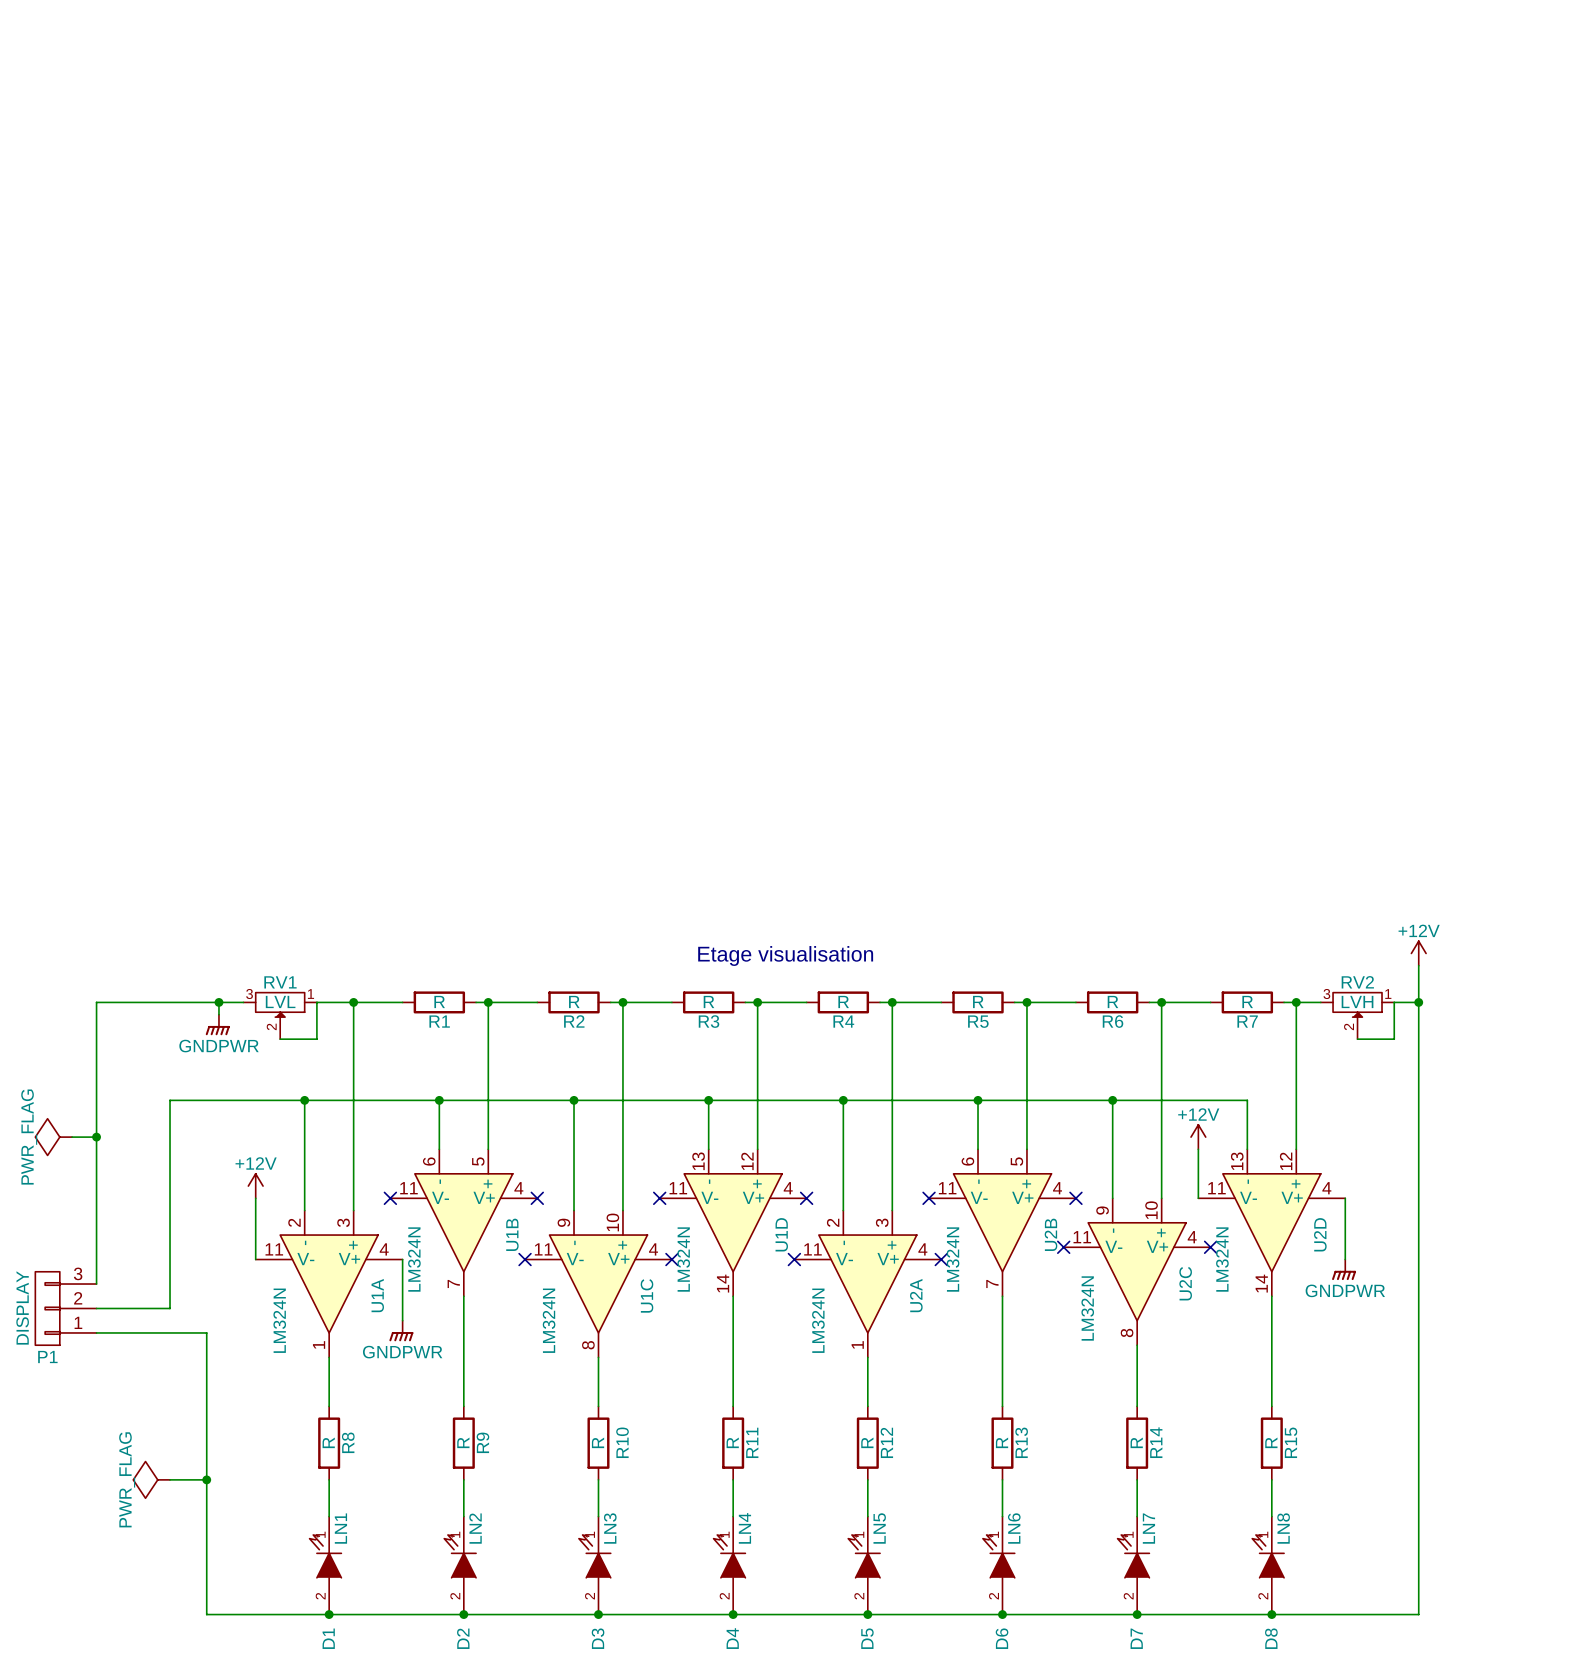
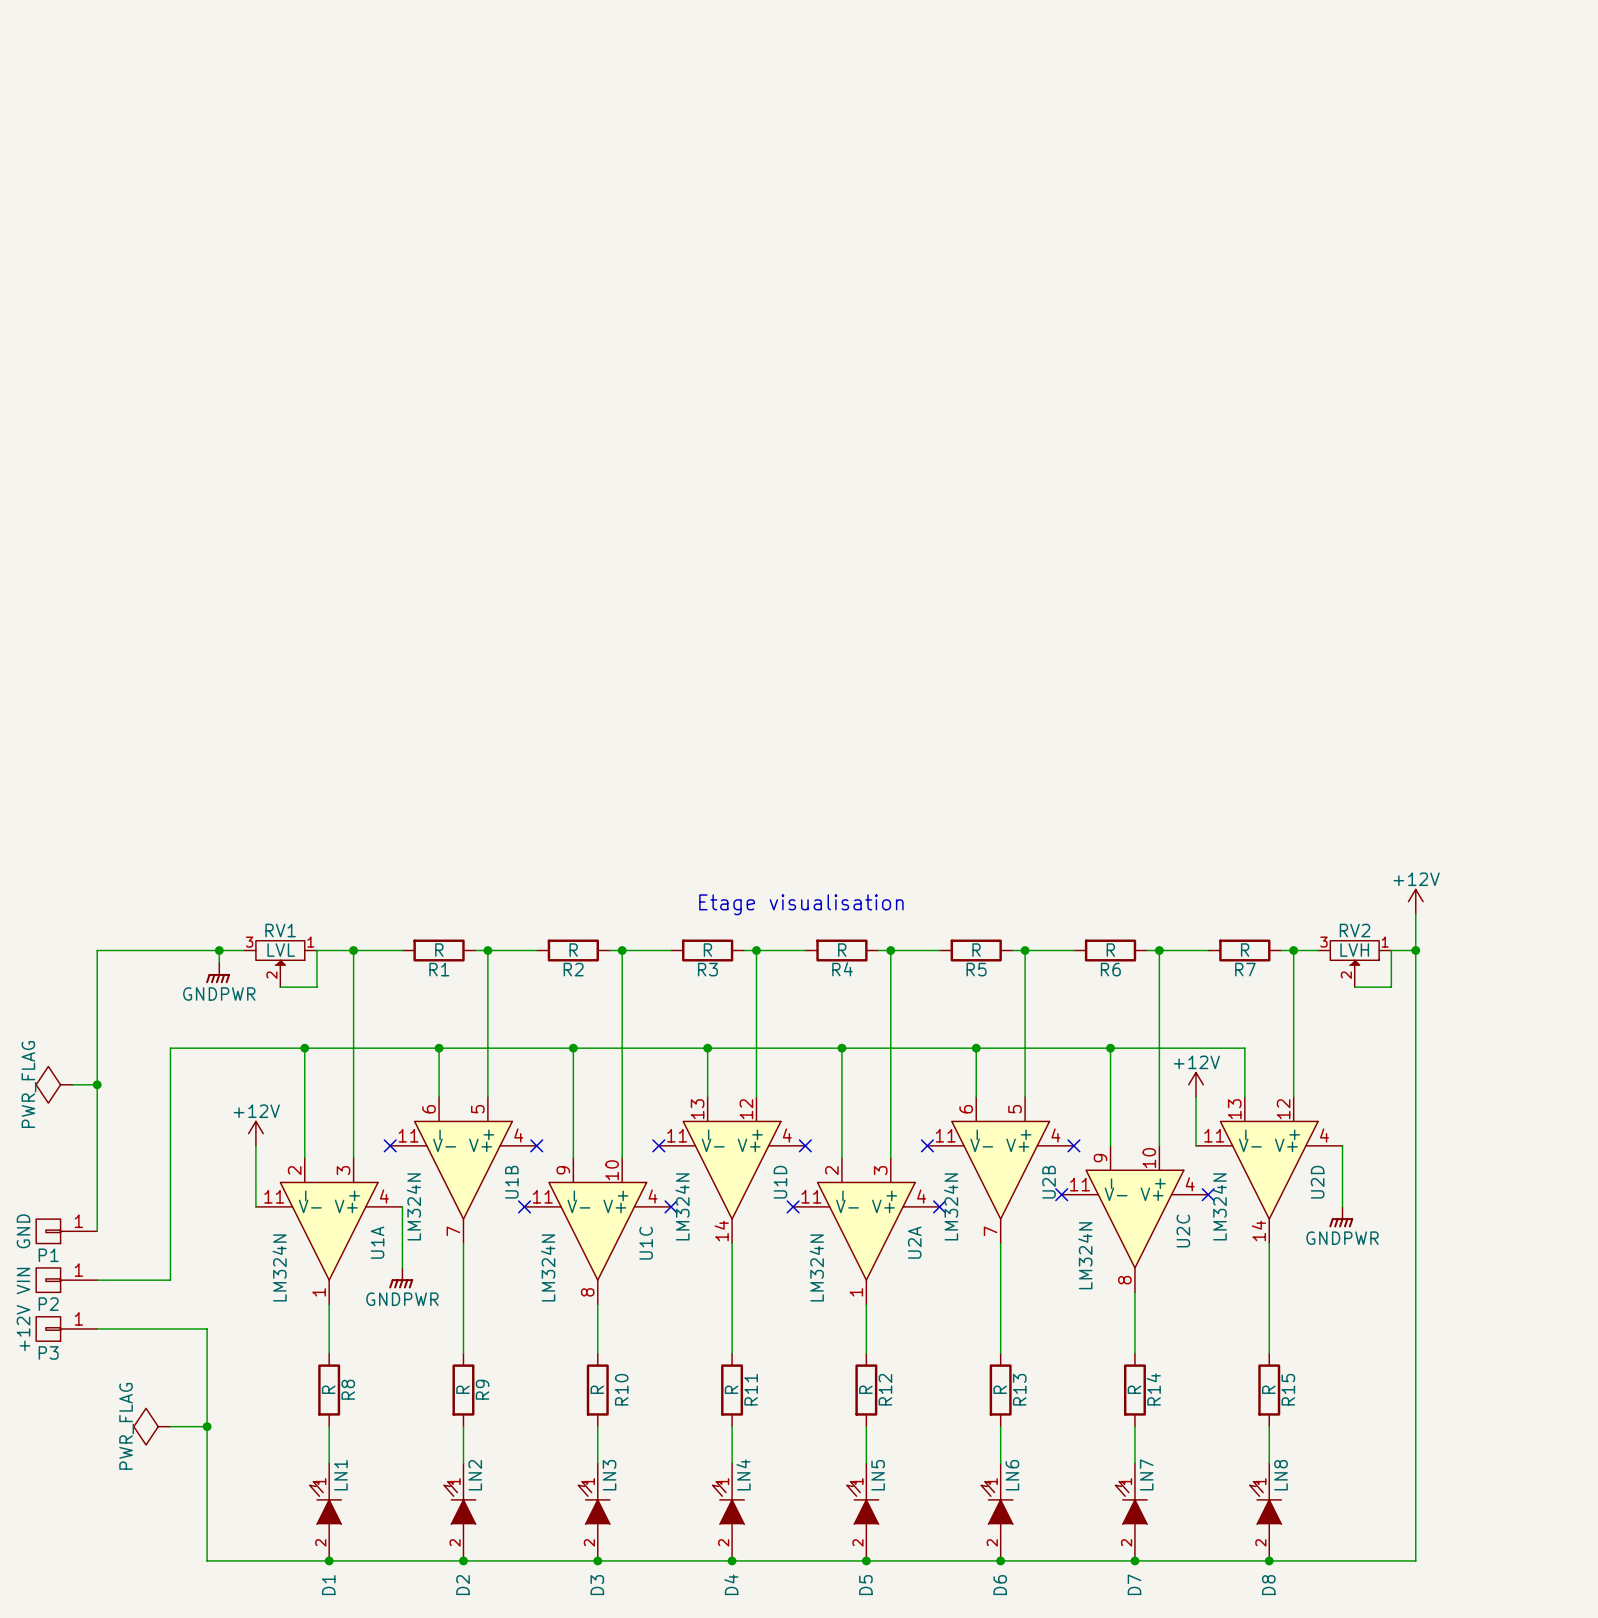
P1 symbol: [35, 1271, 97, 1346] -> [36, 1219, 98, 1244]
P1 value: DISPLAY (22, 1307) -> GND (23, 1231)
wire: (96, 1308) (170, 1308) -> (170, 1280) (170, 1255)
P2: none -> VIN (66, 1280)
wire: (170, 1332) (206, 1332) (206, 1381) -> (97, 1328) (207, 1328)
P1 name position: P1 (47, 1357) -> P1 (48, 1255)
P3: none -> +12V (66, 1328)

